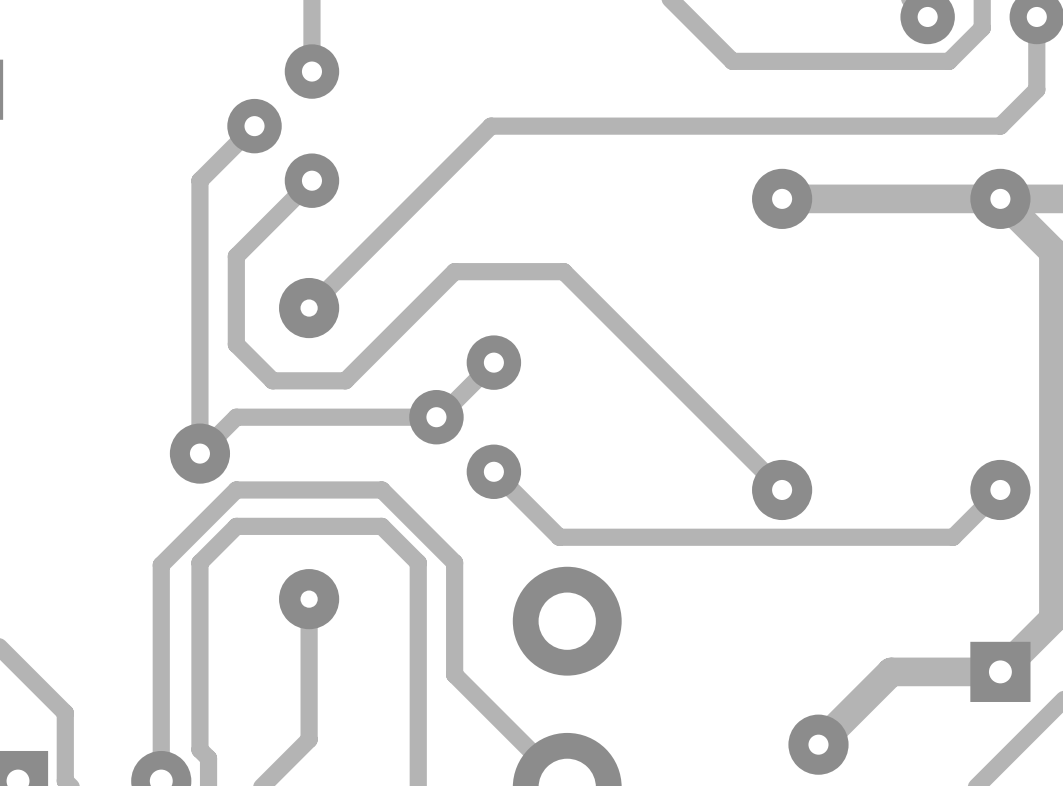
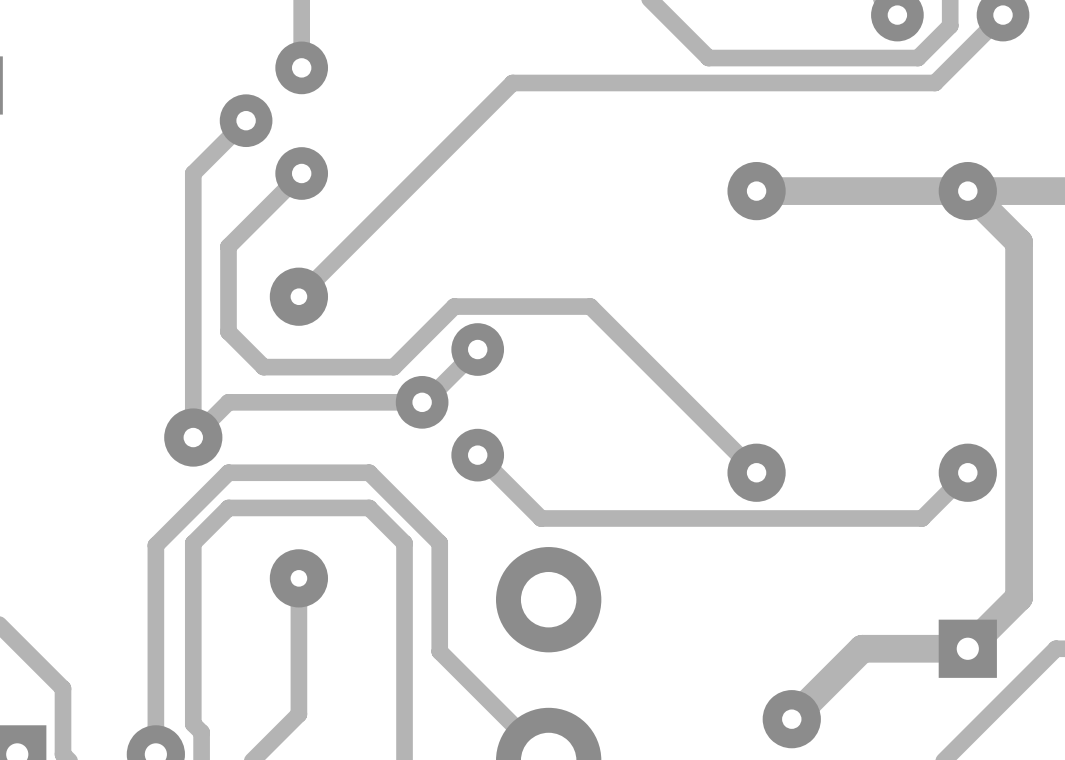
track: (1036, 16) (1036, 89) (1000, 126) (491, 126) -> (1003, 15) (935, 82) (512, 82) (474, 120)
track: (610, 318) (563, 271) (454, 271) (345, 380) -> (590, 306) (454, 306) (393, 367) (334, 367)

